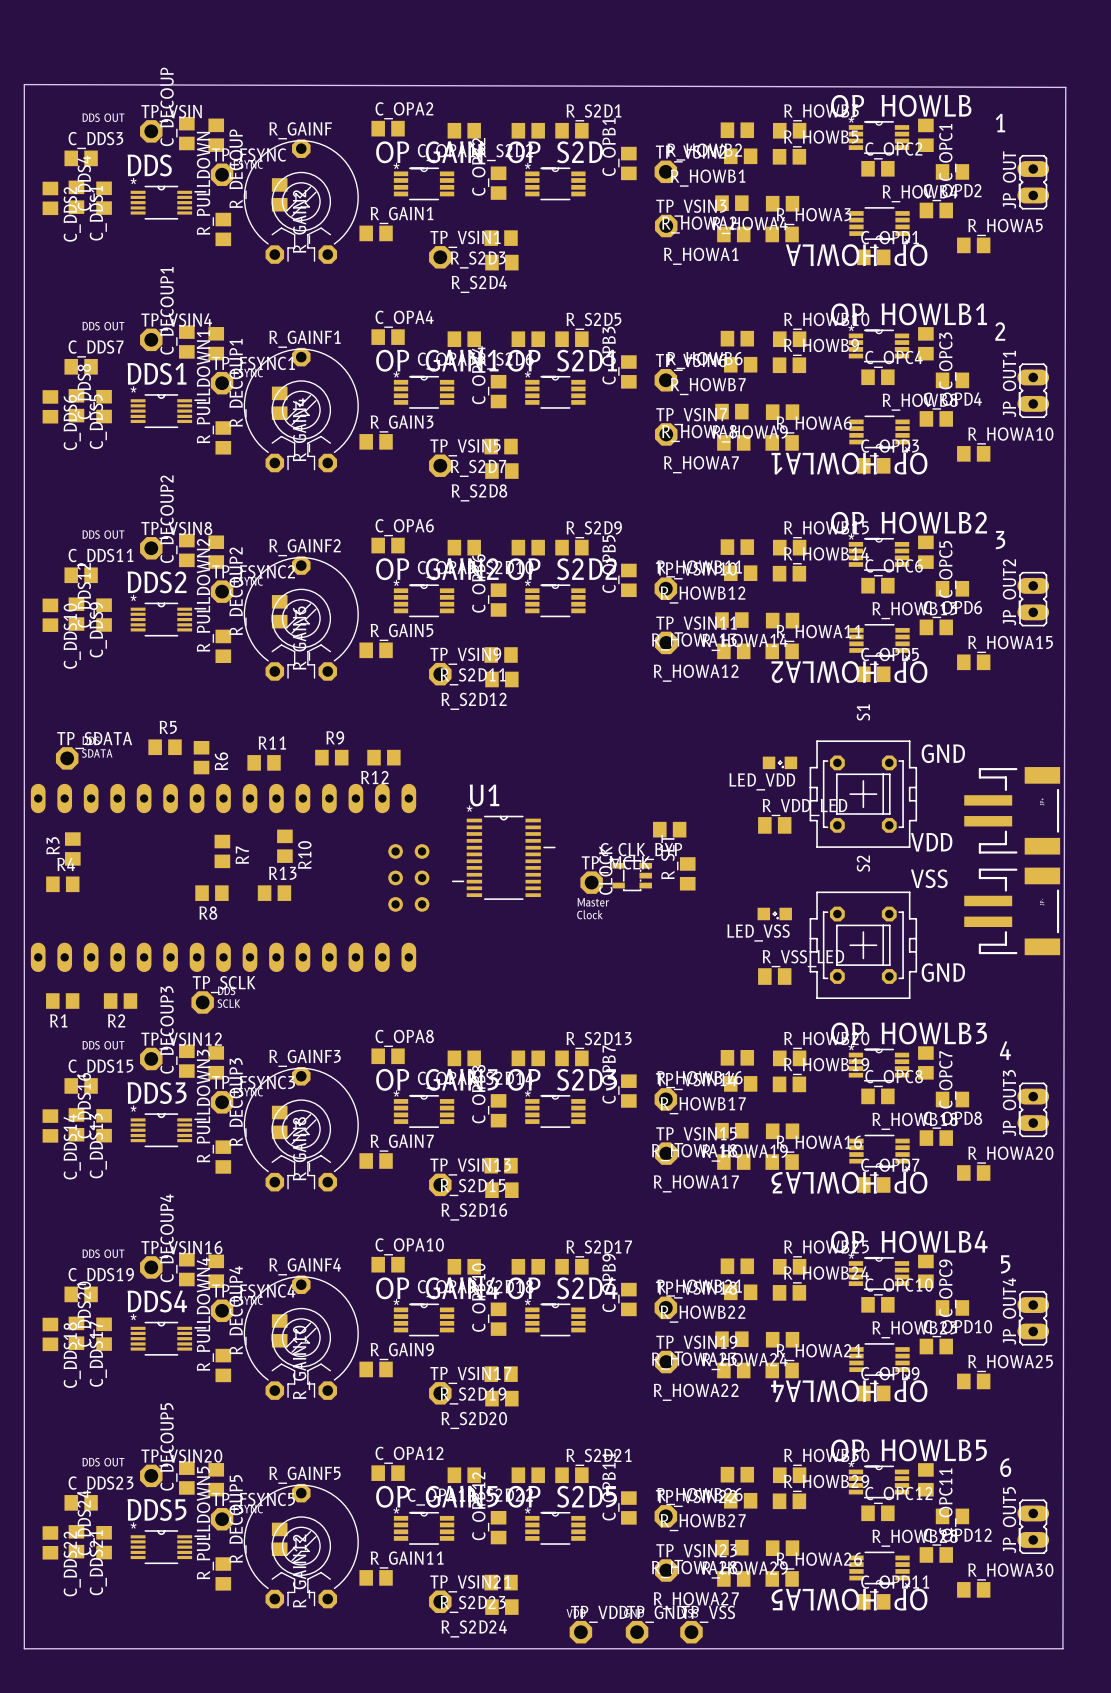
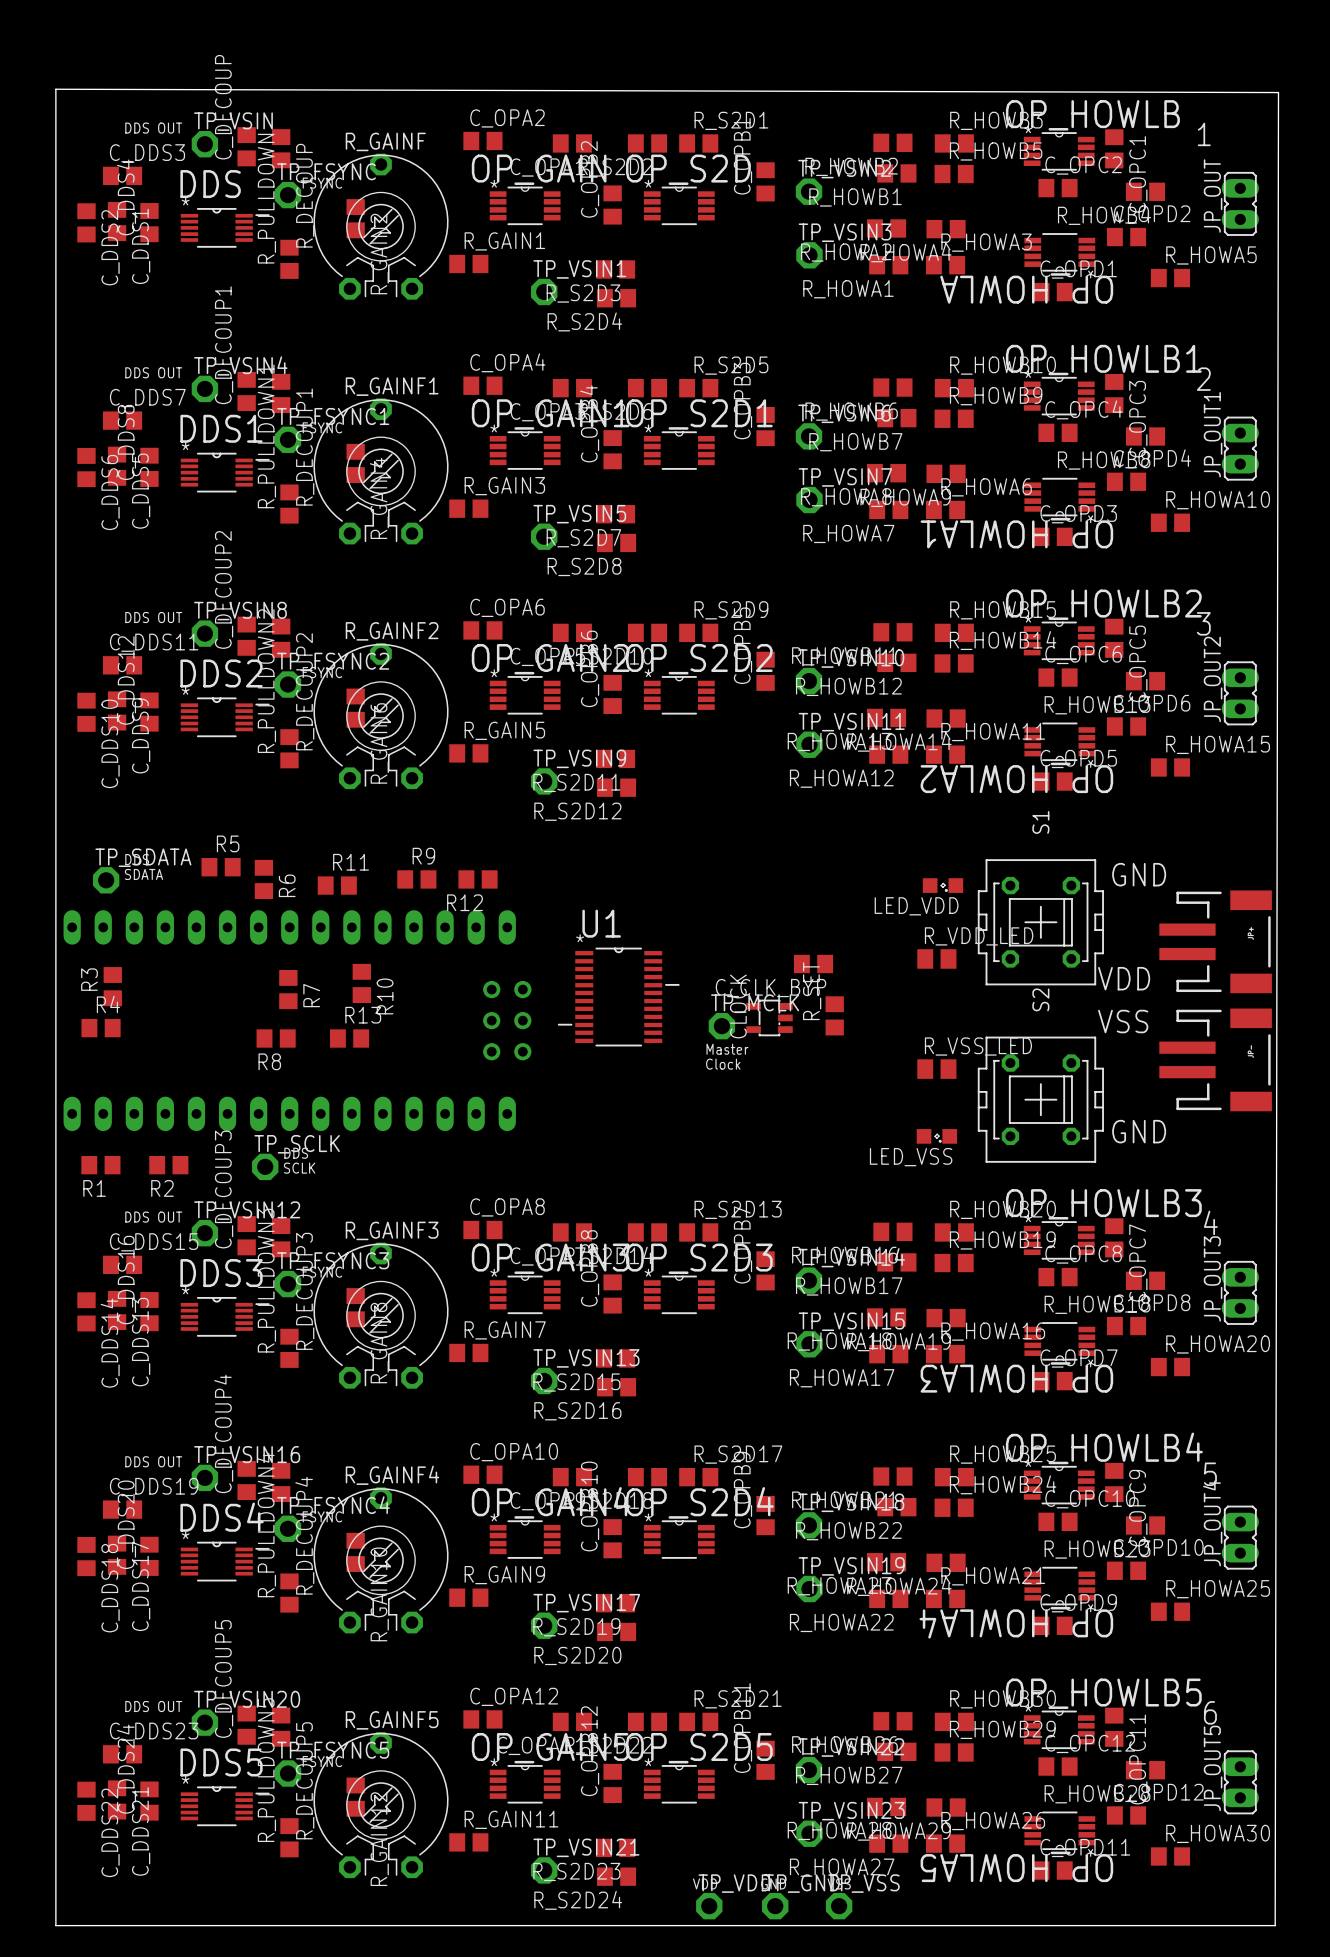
LED_VSS position: (774, 913) -> (936, 1136)
R_VSS_LED position: (774, 976) -> (936, 1069)

